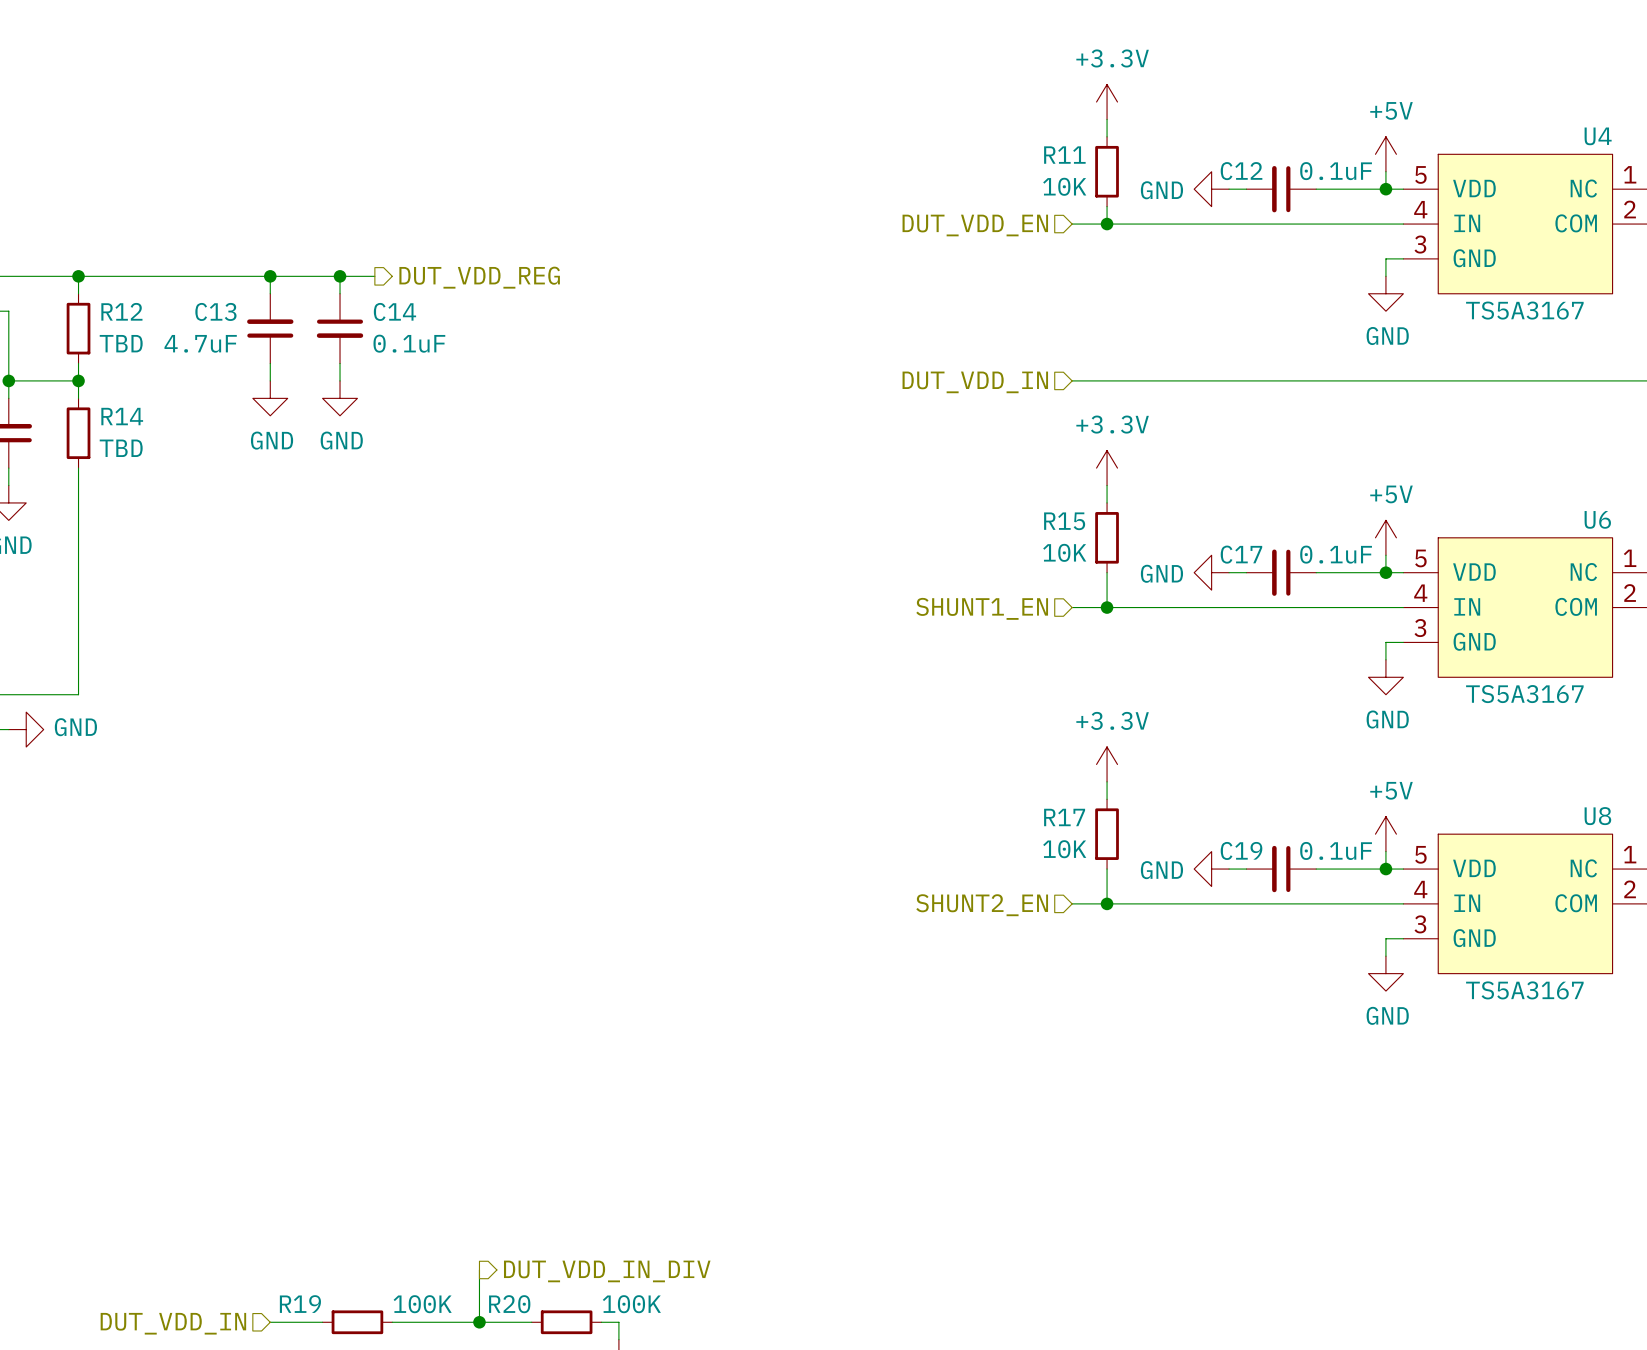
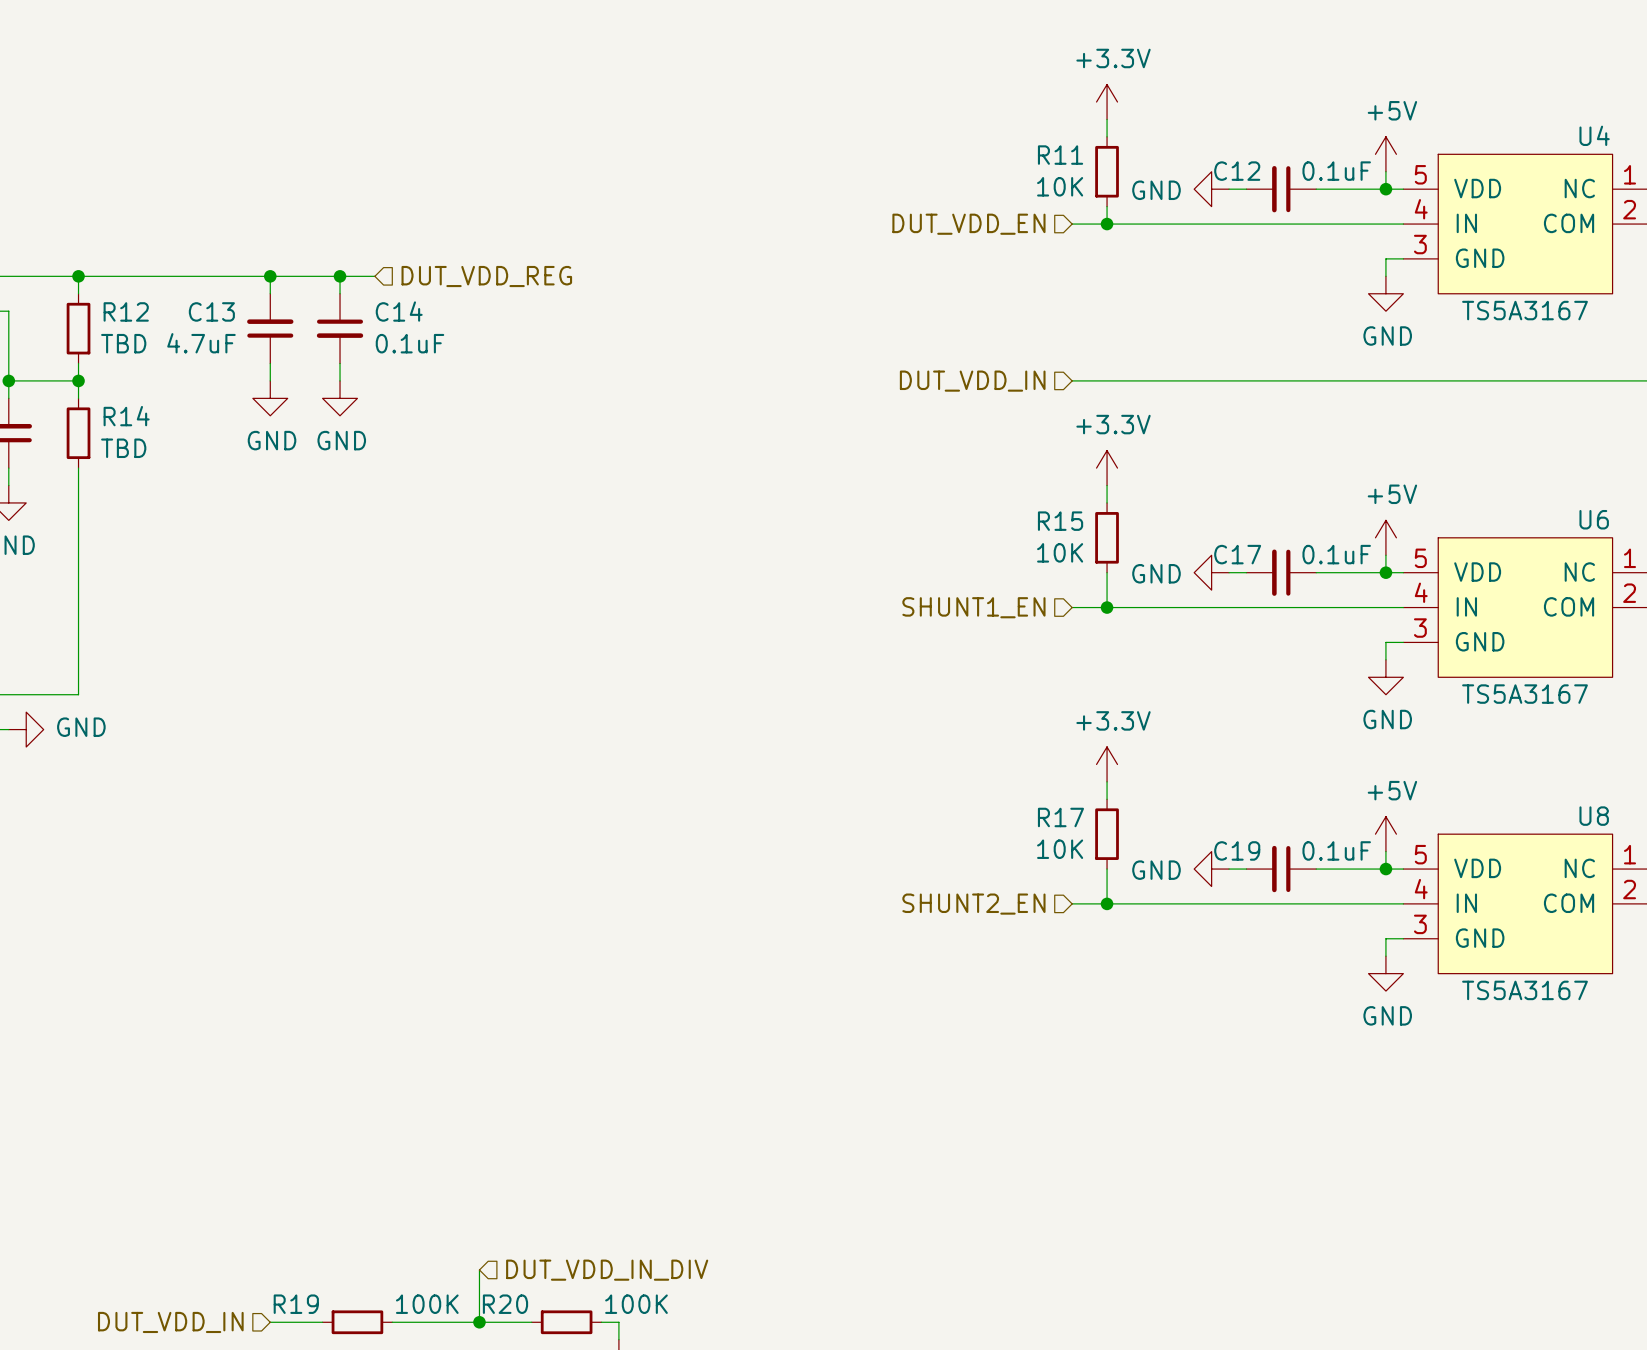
hierarchical label shape: output (479, 277) -> input (486, 276)
hierarchical label shape: output (607, 1271) -> input (607, 1270)

